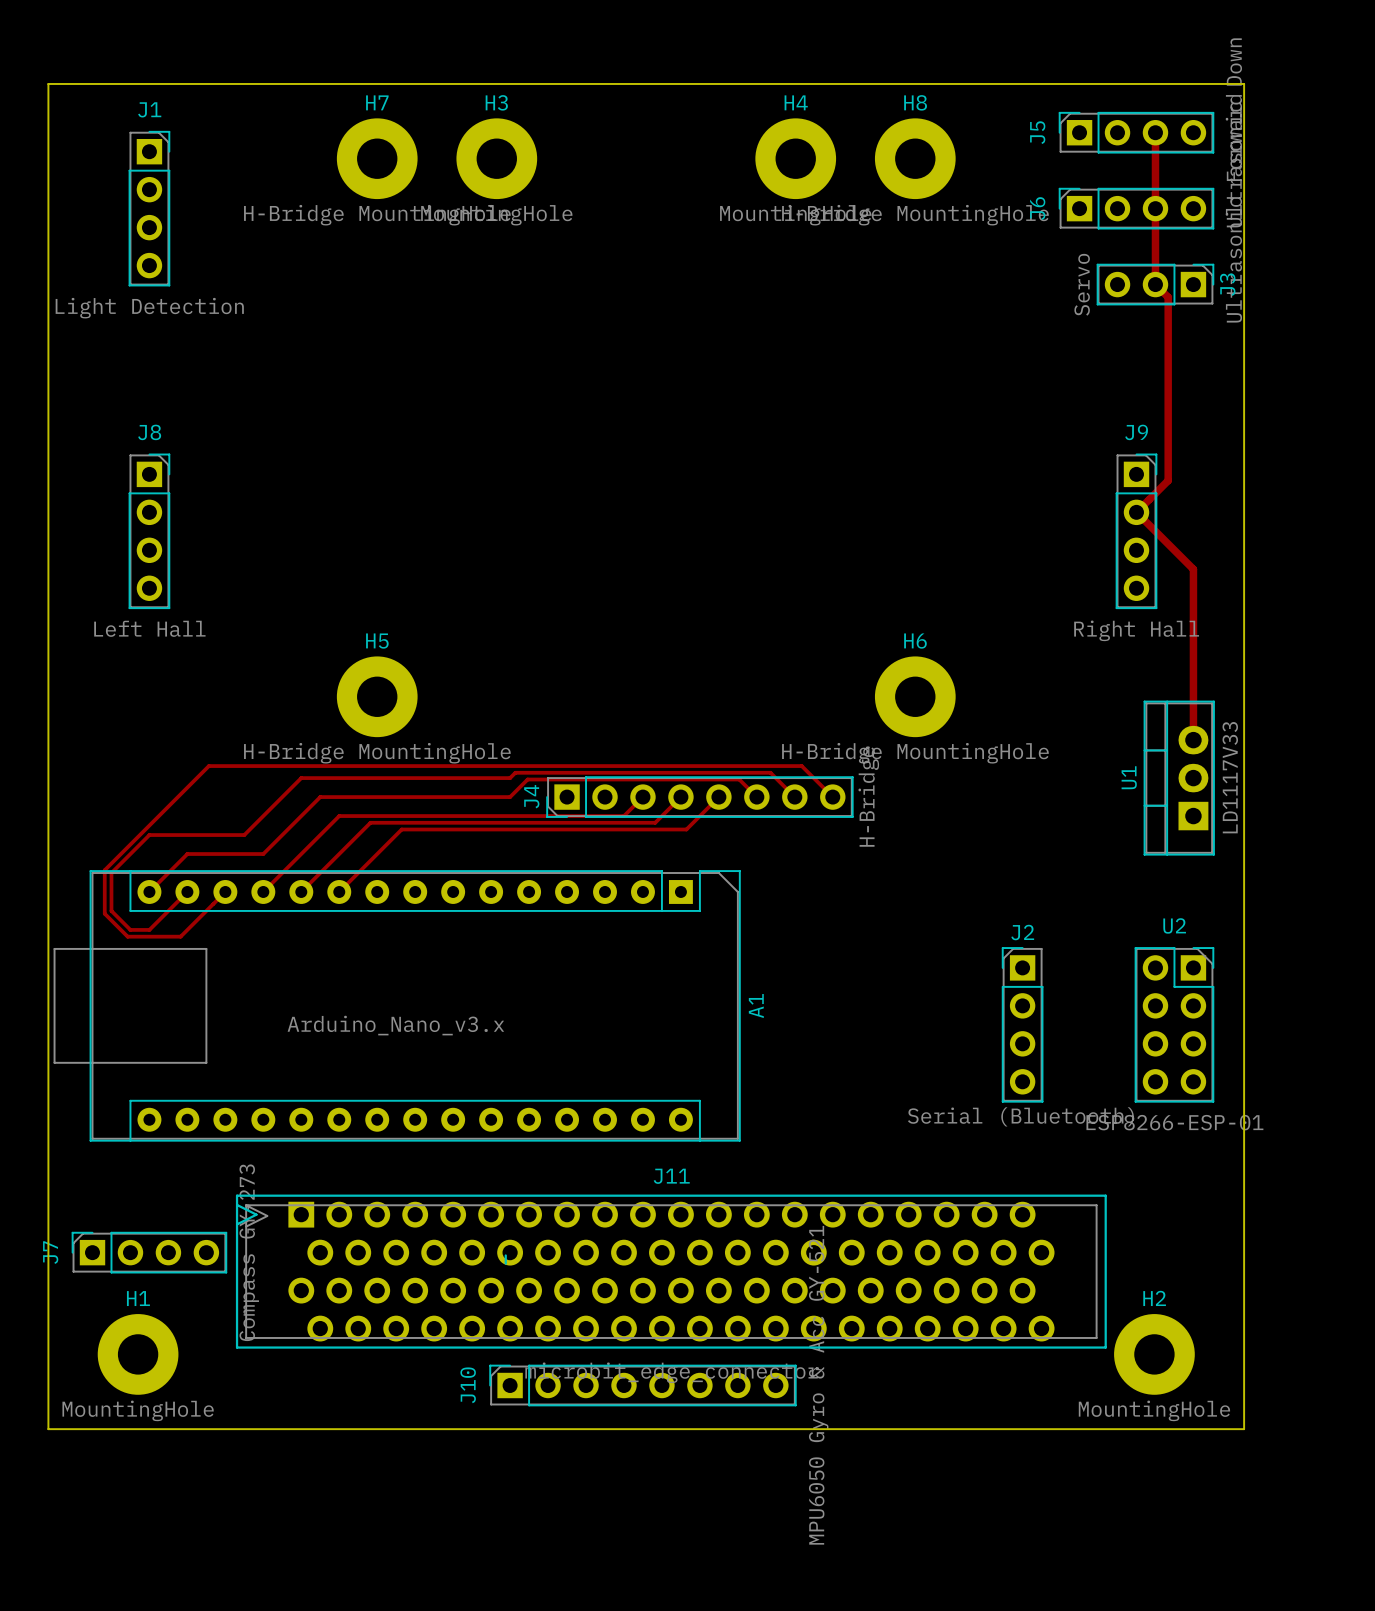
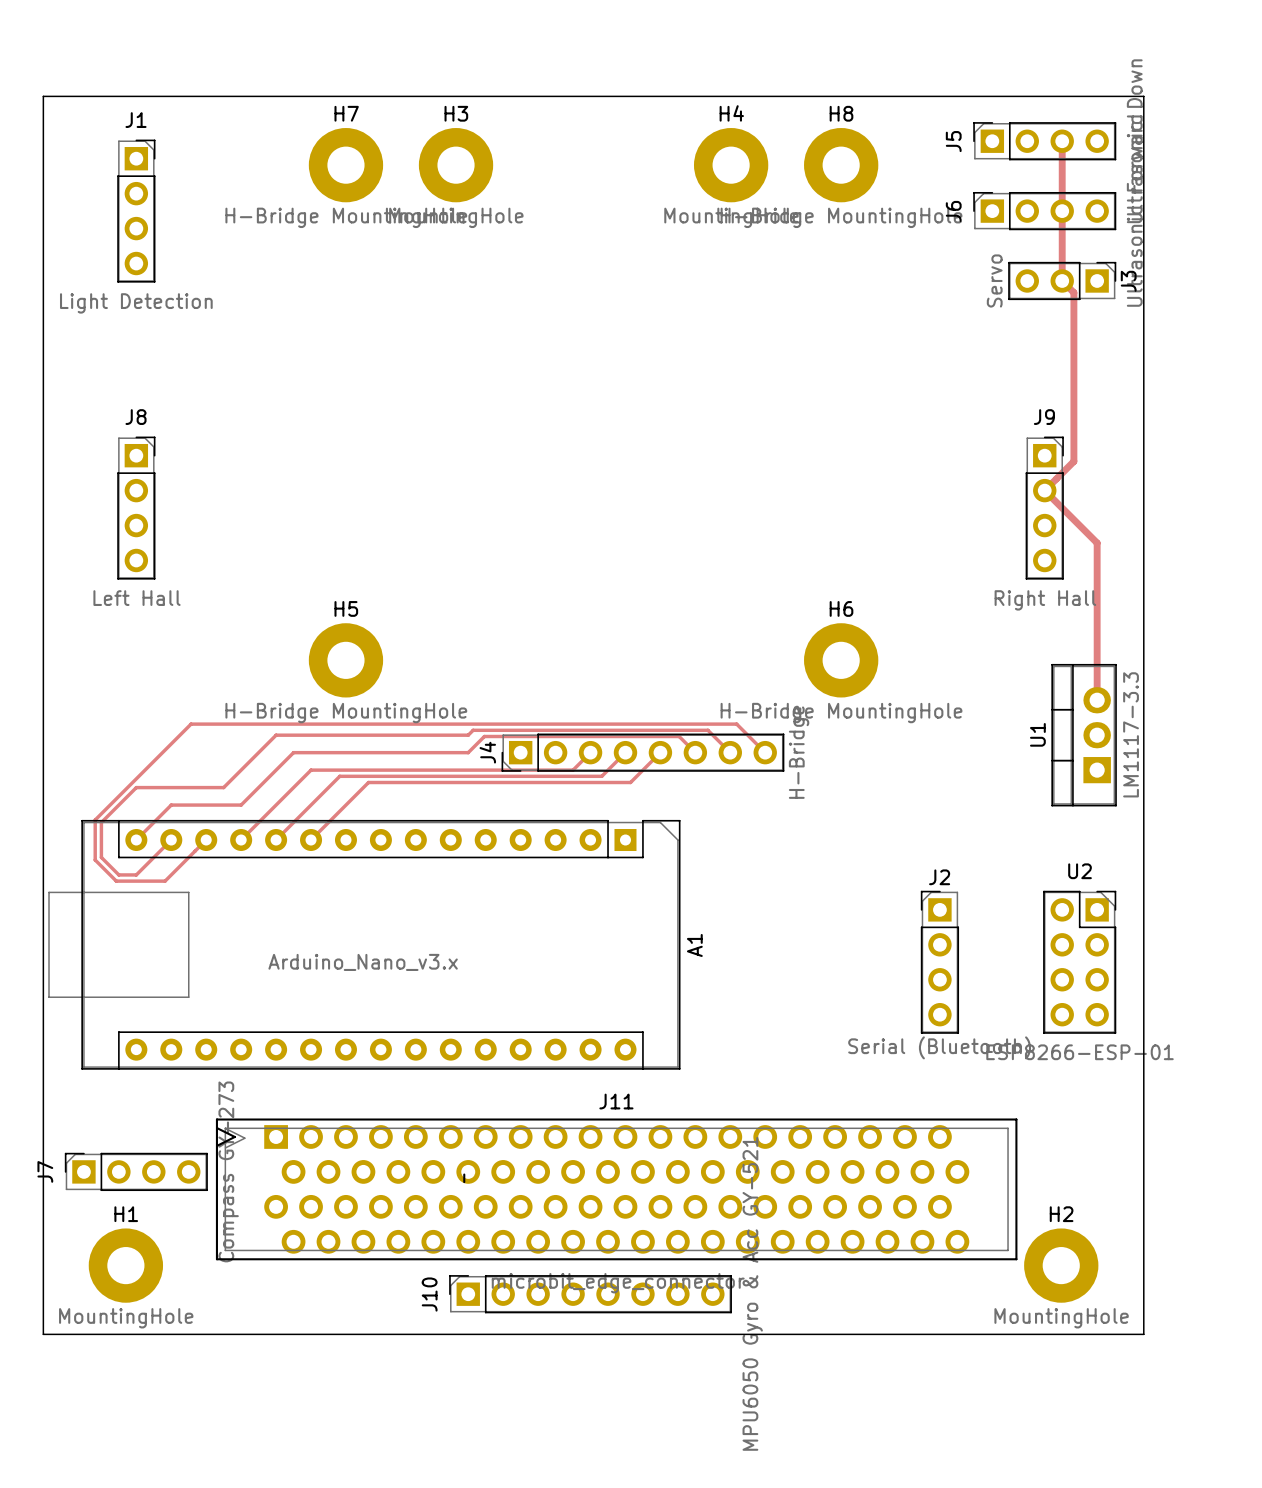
U1 value: LD1117V33 (1230, 777) -> LM1117-3.3 (1131, 734)

